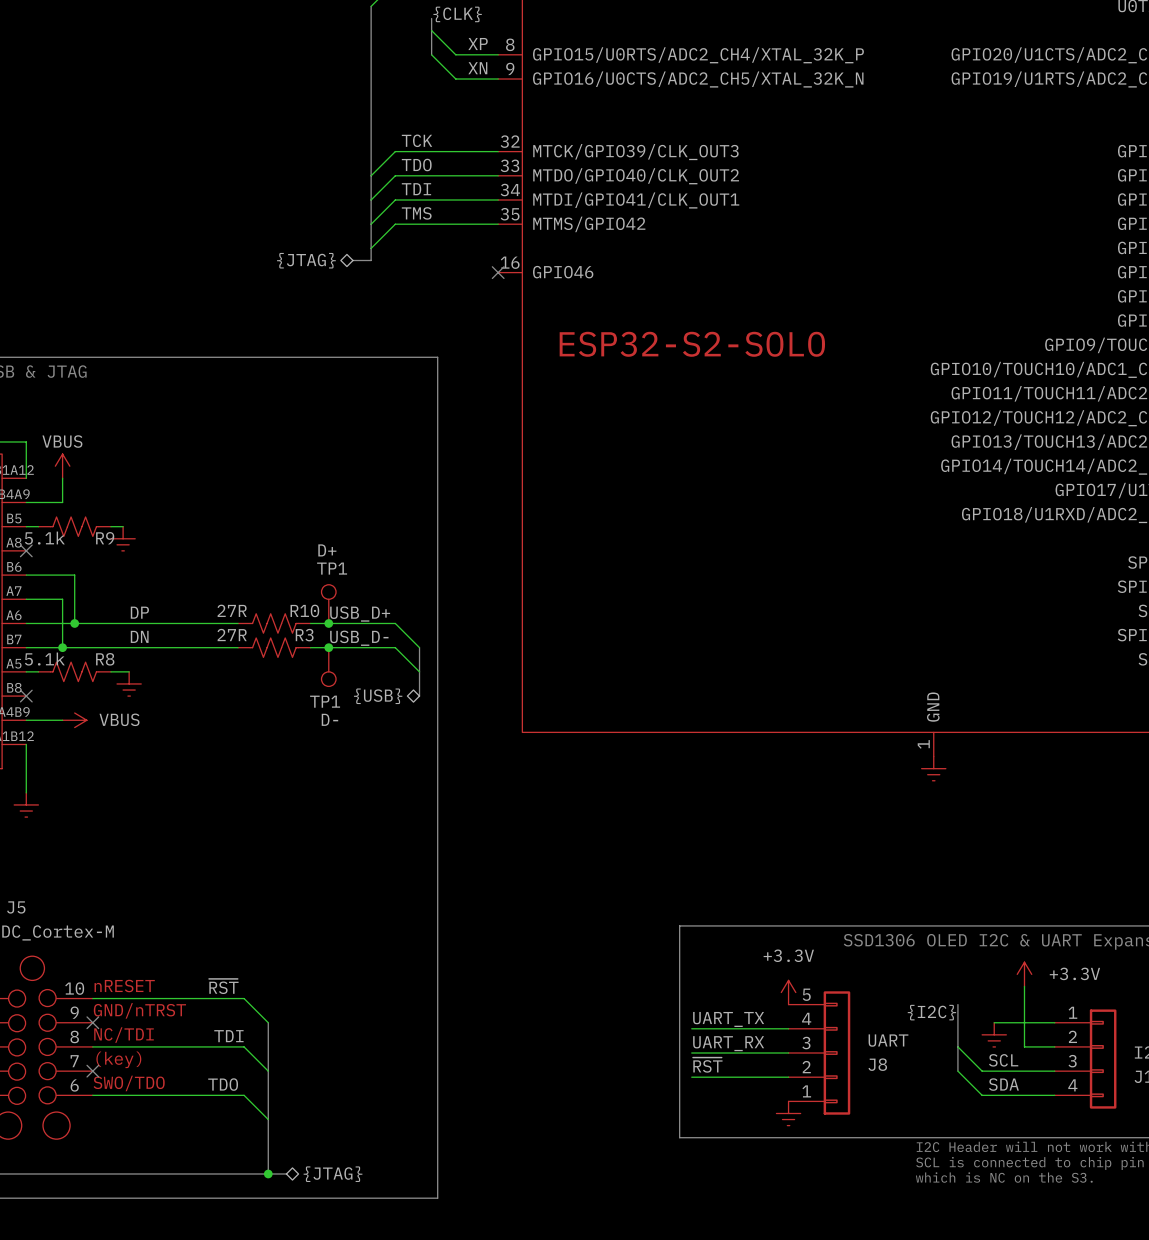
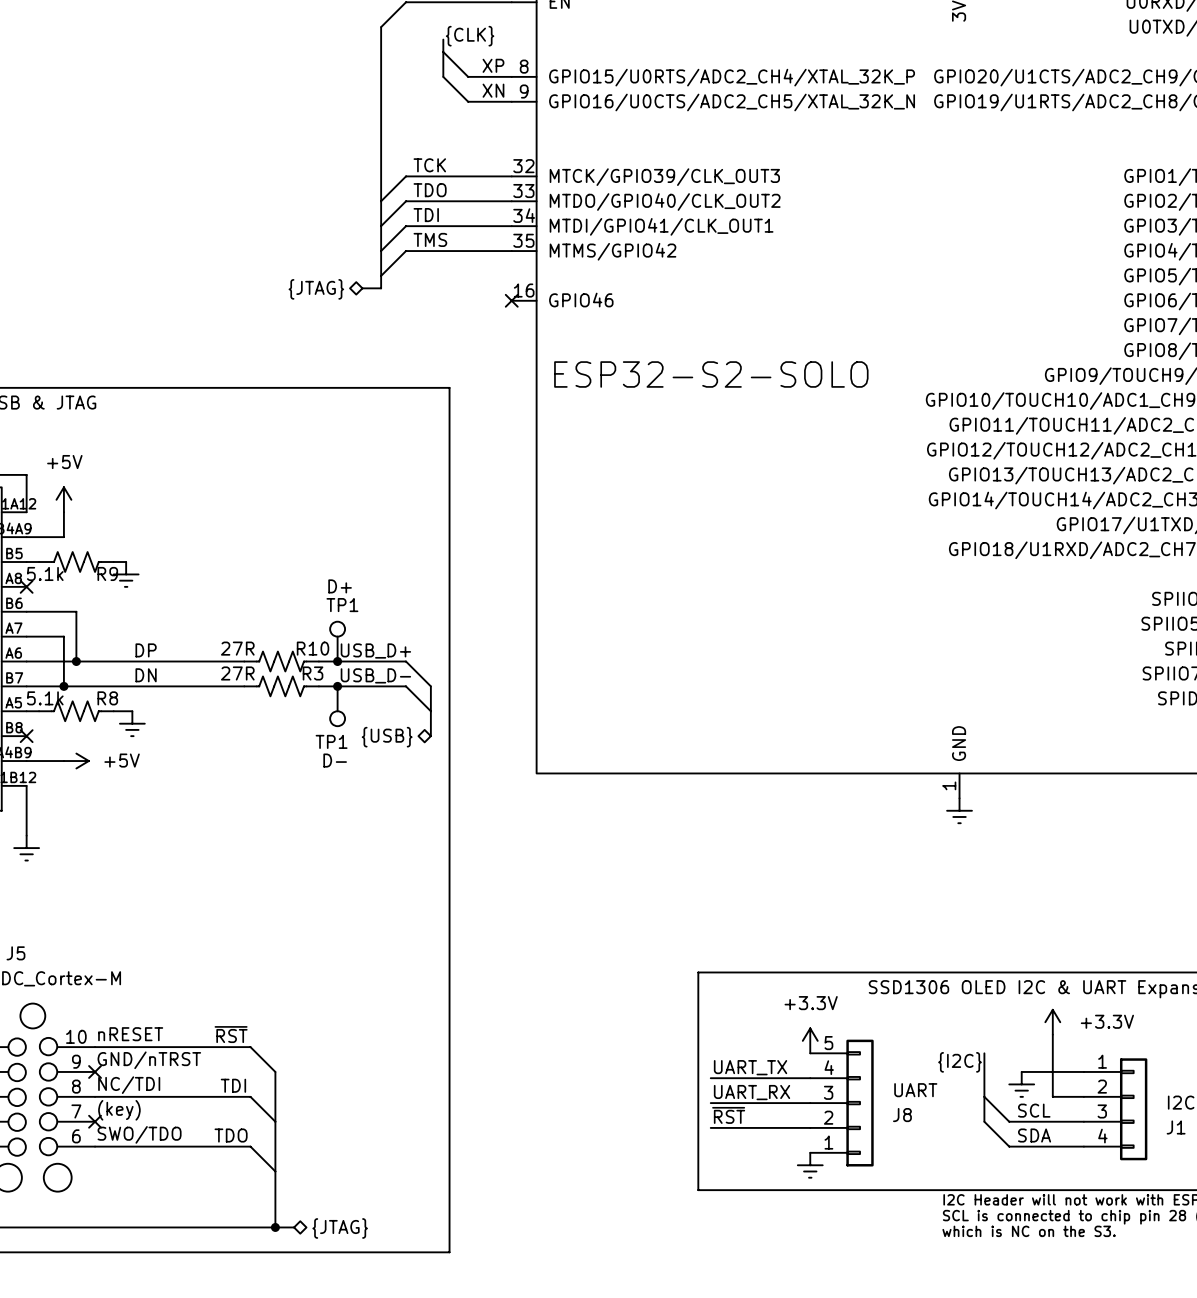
power symbol: VBUS (62, 466) -> +5V (63, 499)
power symbol: VBUS (74, 720) -> +5V (76, 761)

